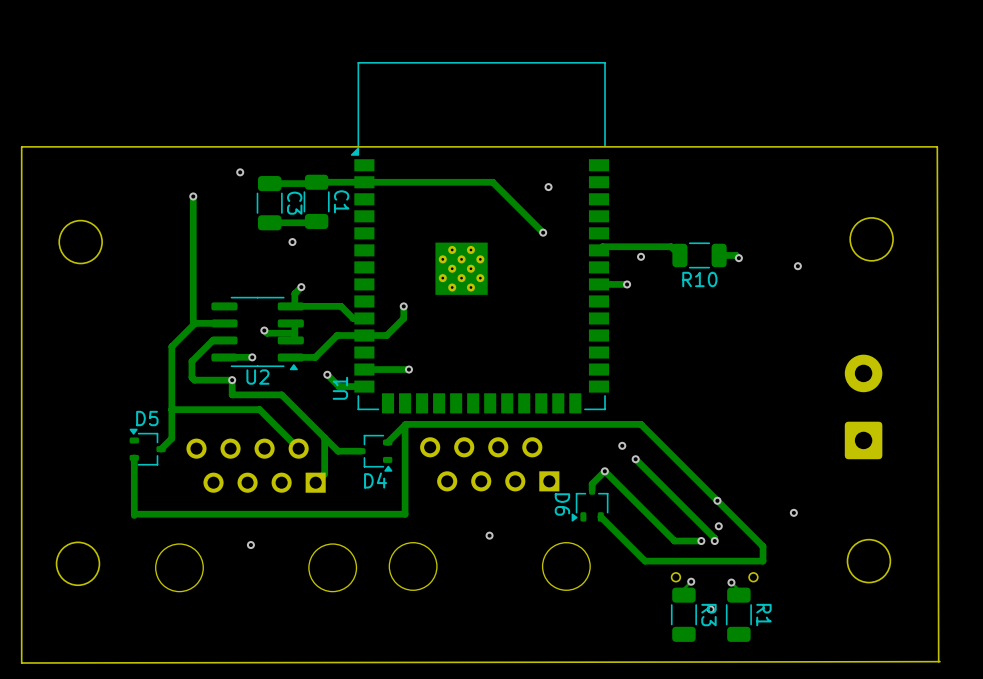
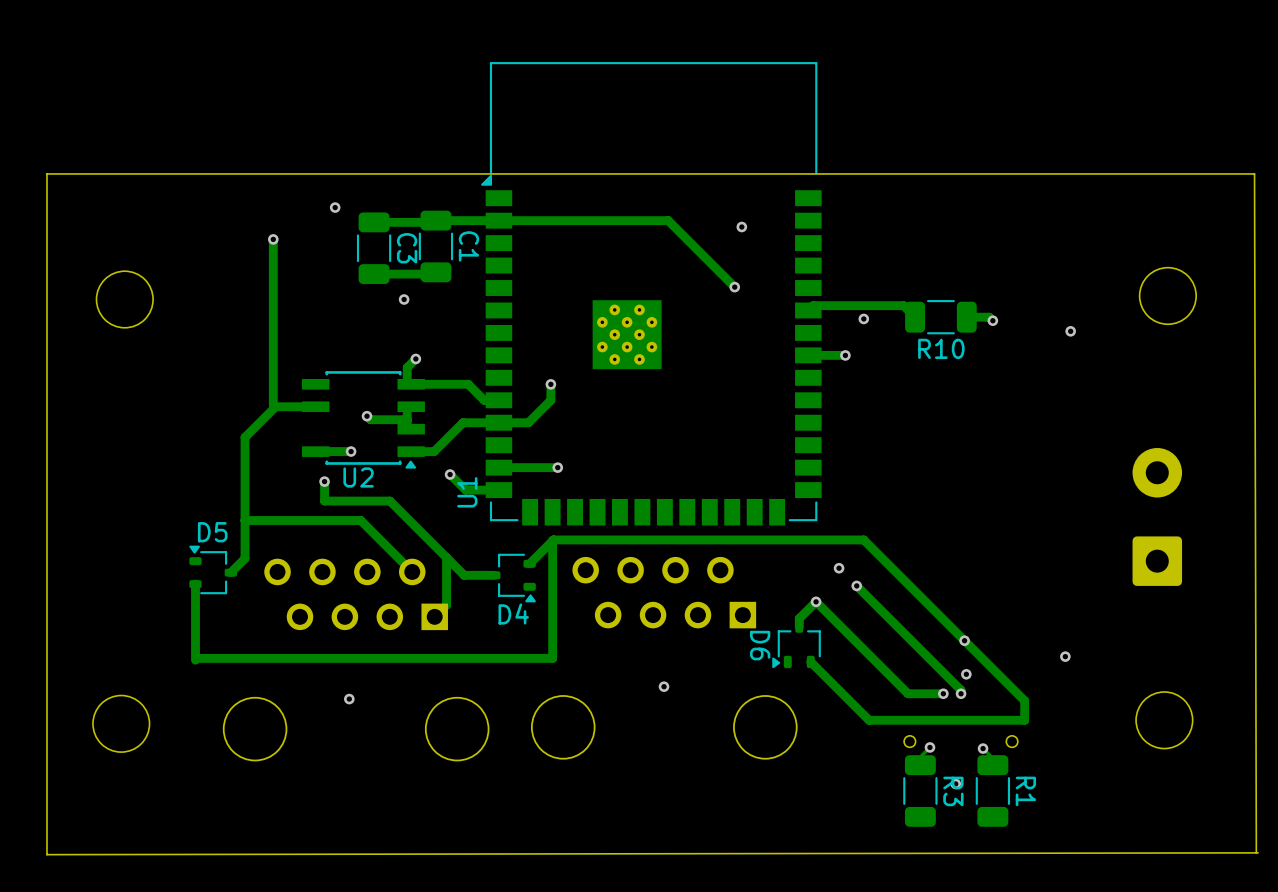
U2 footprint: [211, 296, 304, 371] -> [302, 371, 425, 469]
track: (224, 340) (212, 340) (191, 361) (191, 377) (194, 380) (232, 380) -> none

